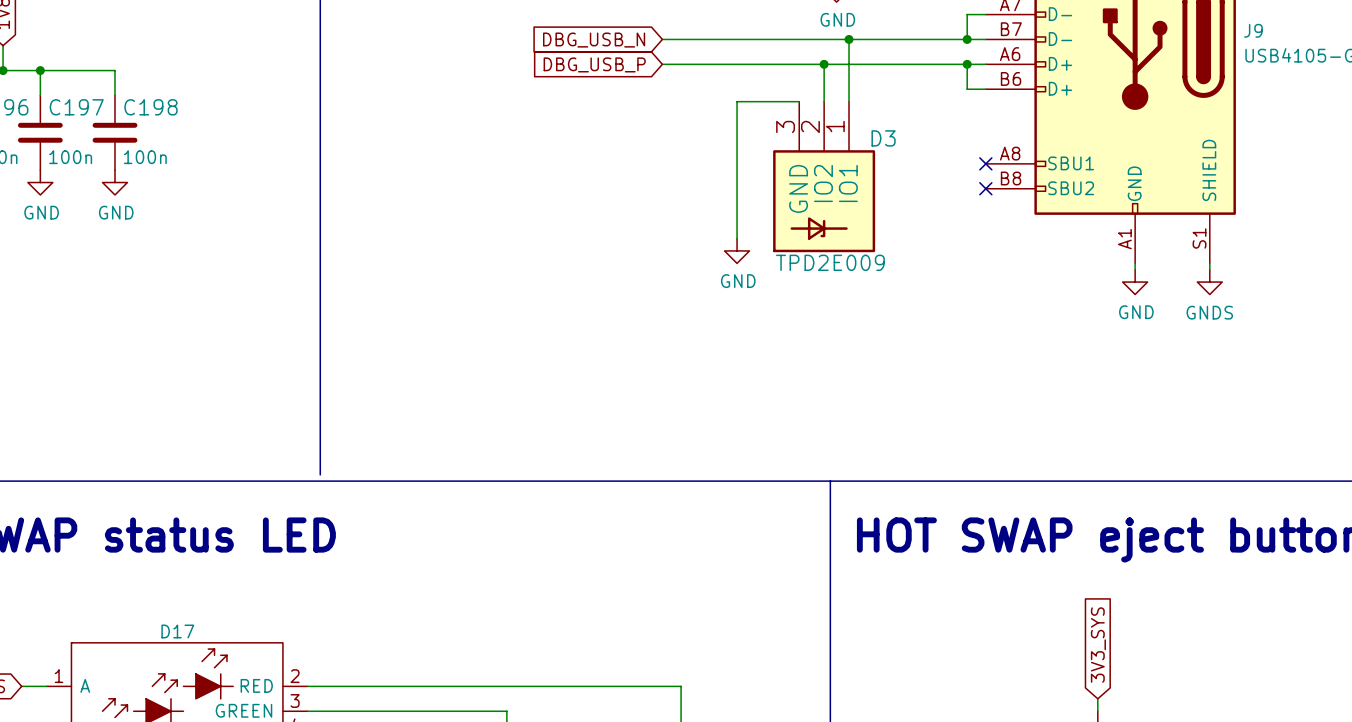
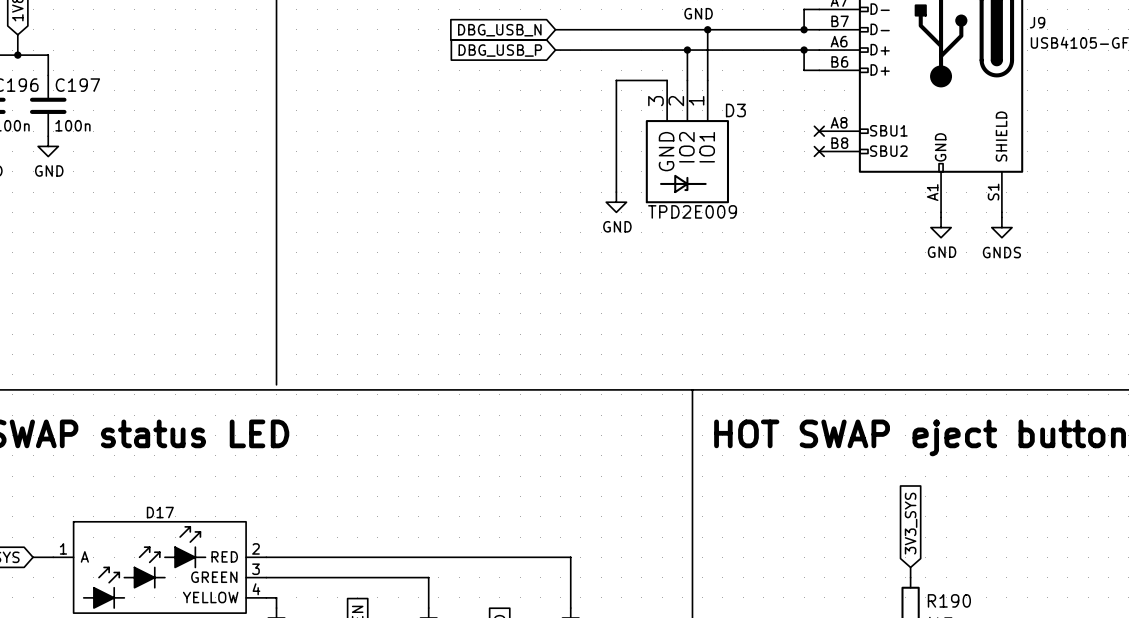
wire: (40, 70) (115, 70) (115, 95) -> none
junction: (40, 70) -> none
C198: (115, 132) -> none
power symbol: GND (115, 182) -> none

